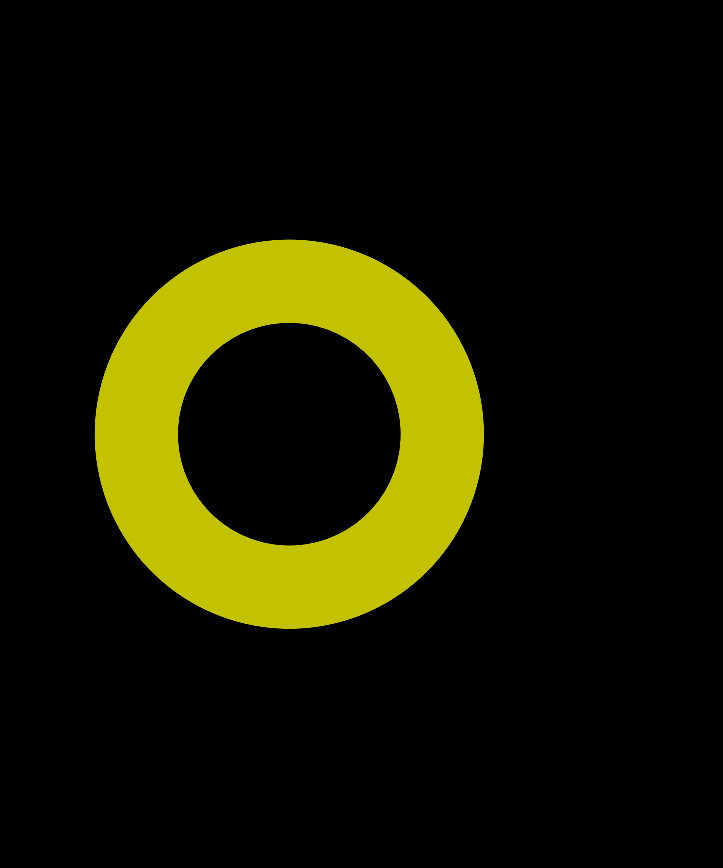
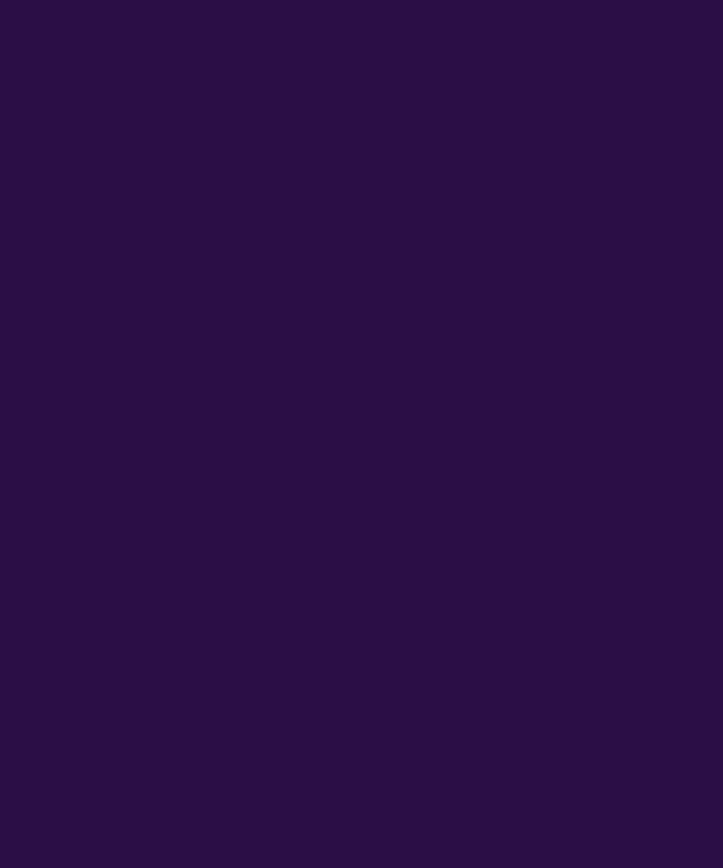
part: (289, 434) -> none

